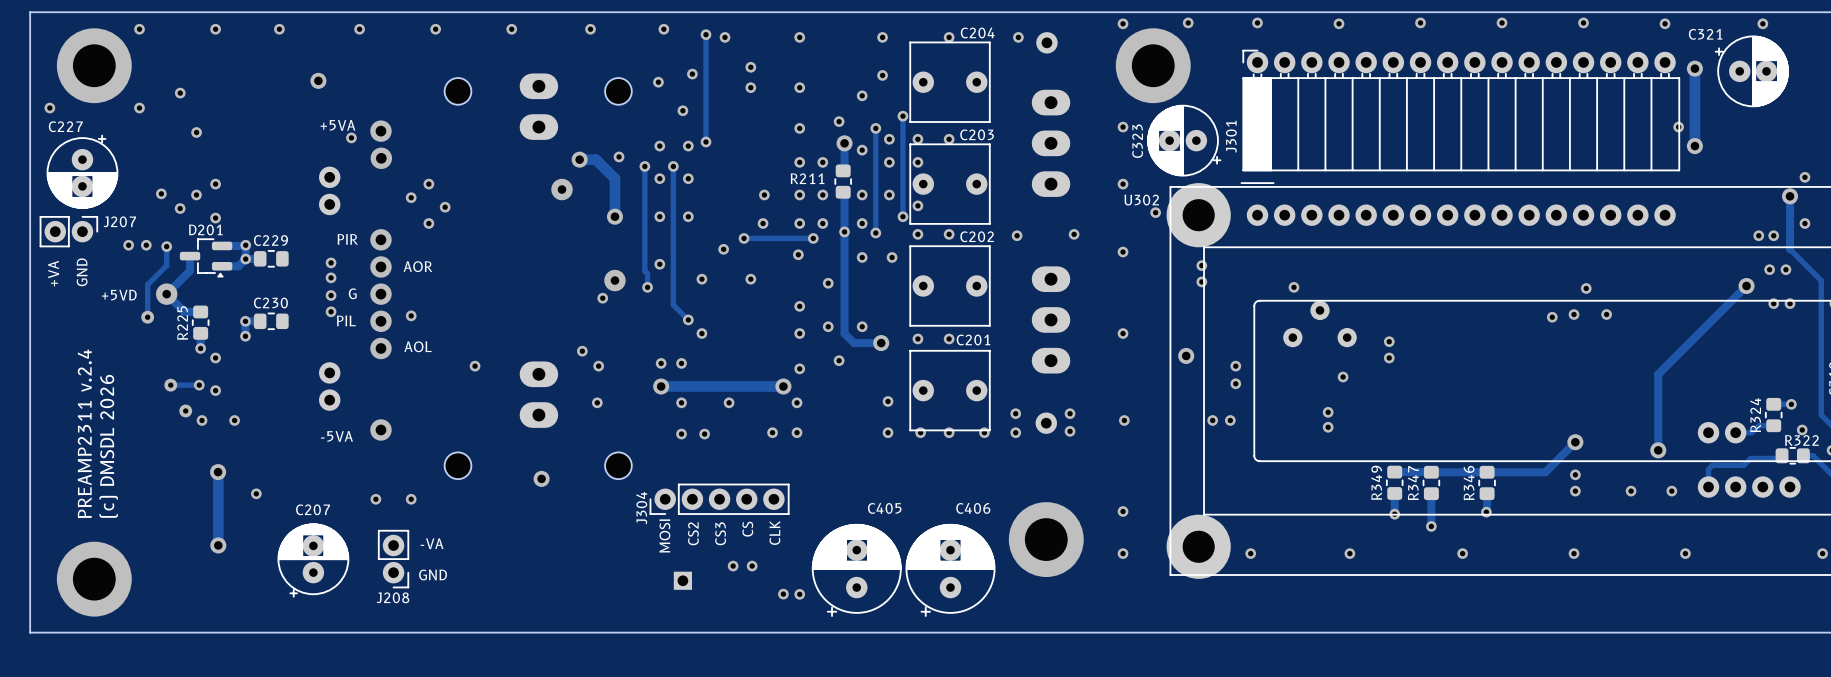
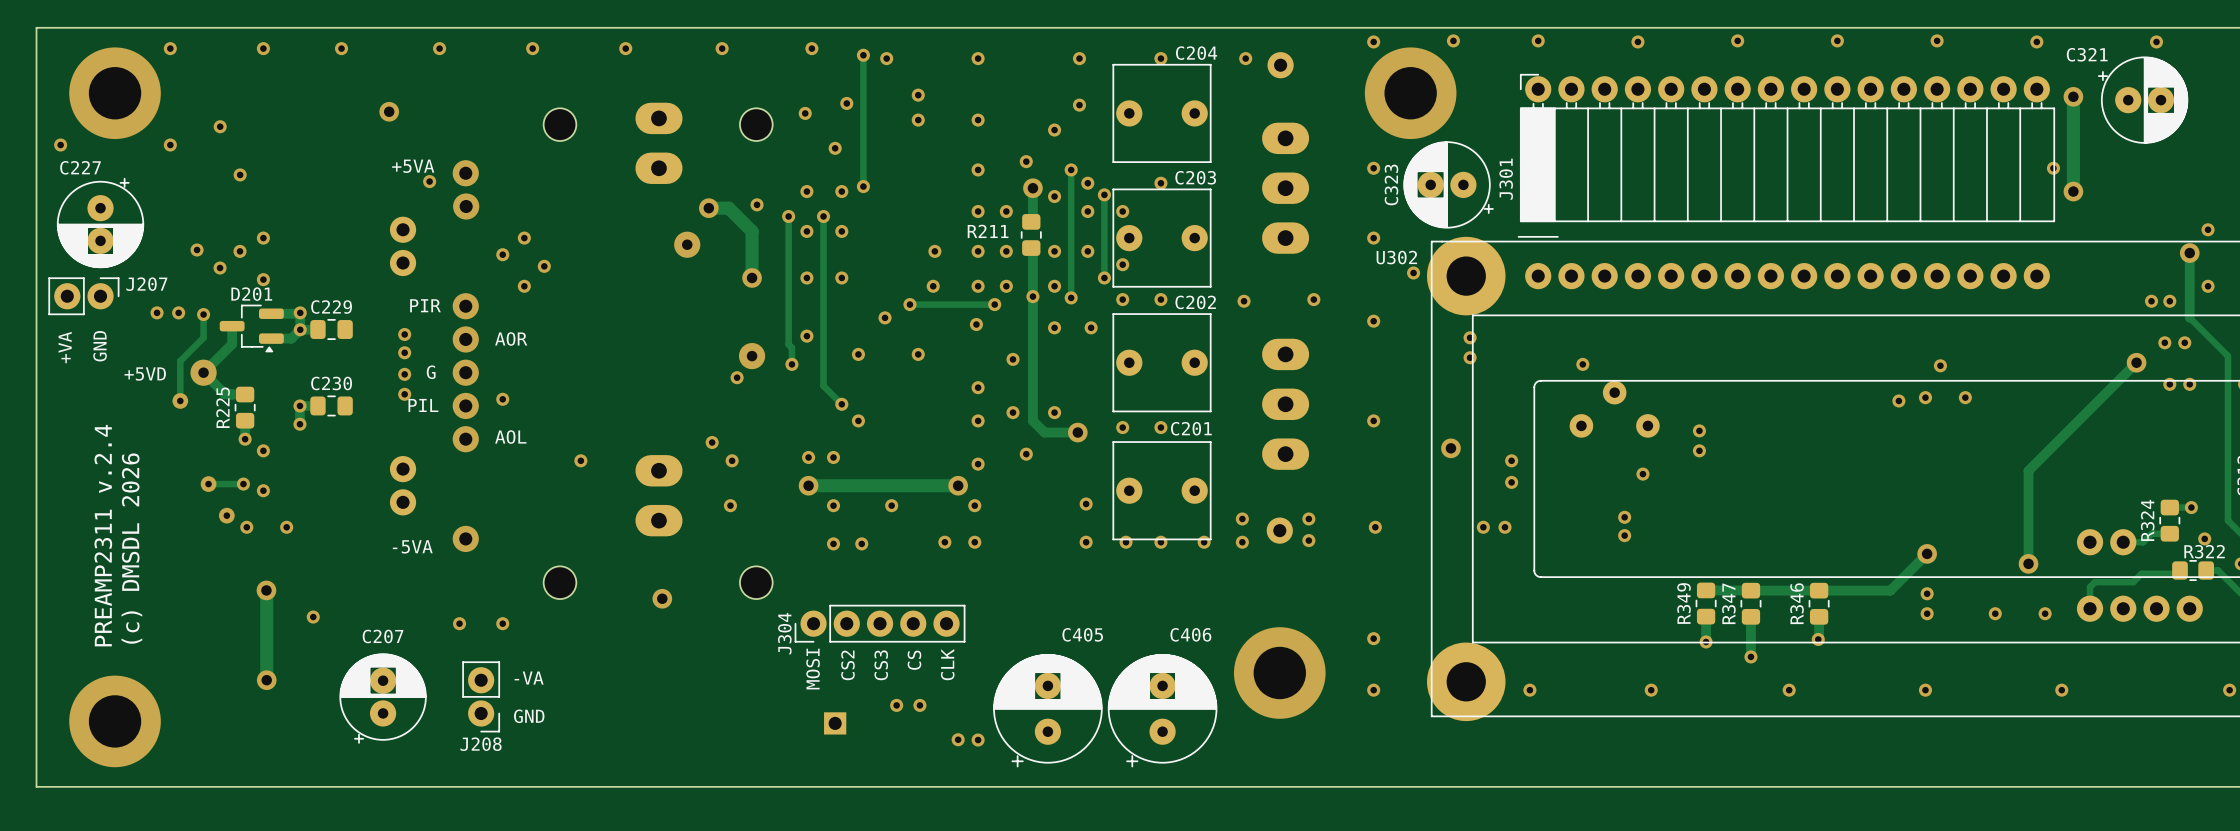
track: (902, 116) (902, 148) -> none
via: (902, 116) -> none
via: (917, 139) -> none
via: none -> (1104, 194)

